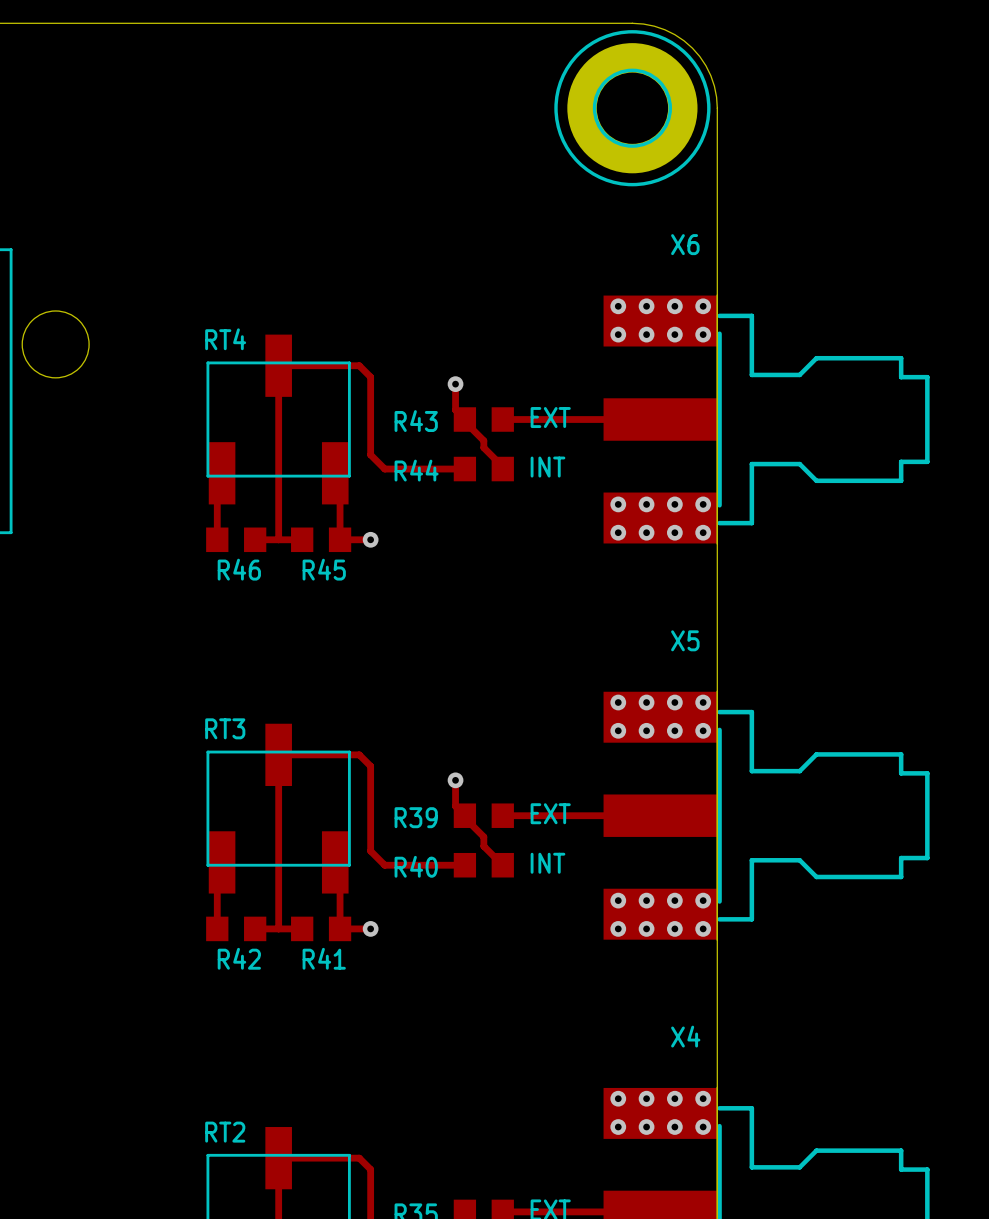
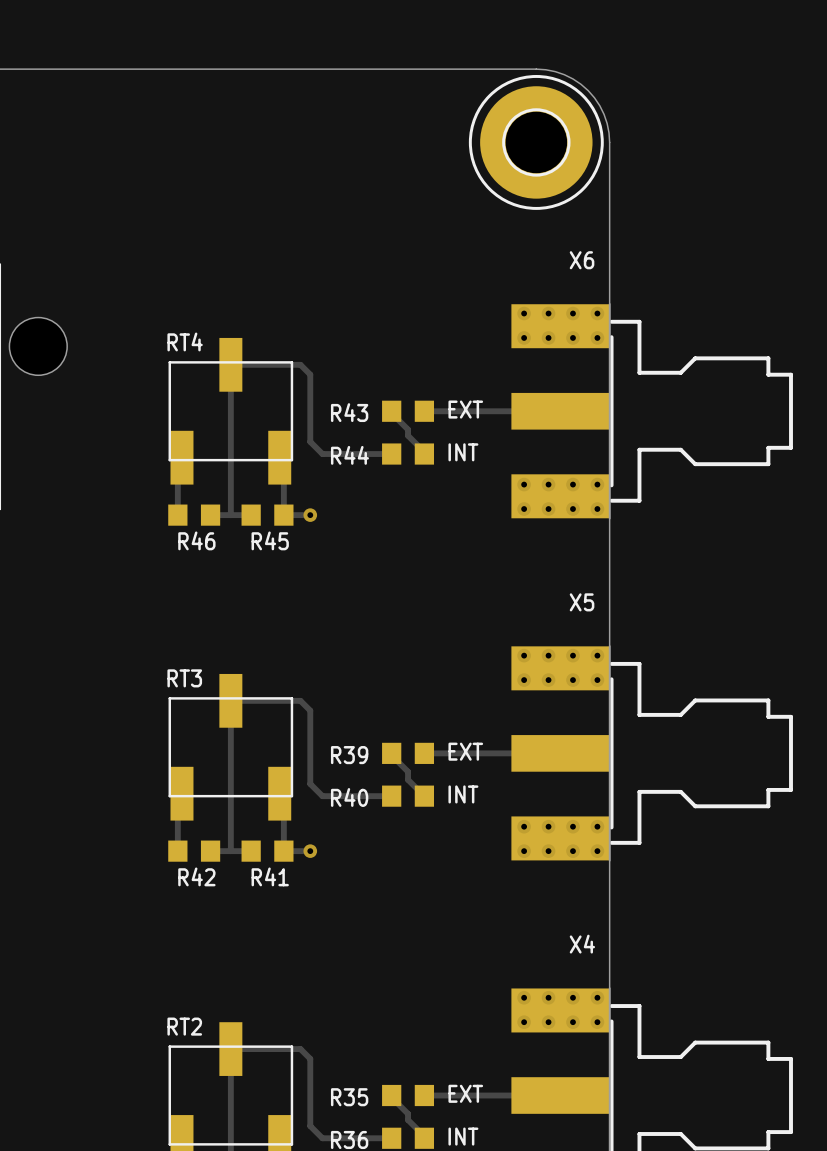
track: (455, 384) (455, 410) (464, 419) -> none
via: (455, 384) -> none
track: (455, 780) (455, 806) (464, 815) -> none
via: (455, 780) -> none

